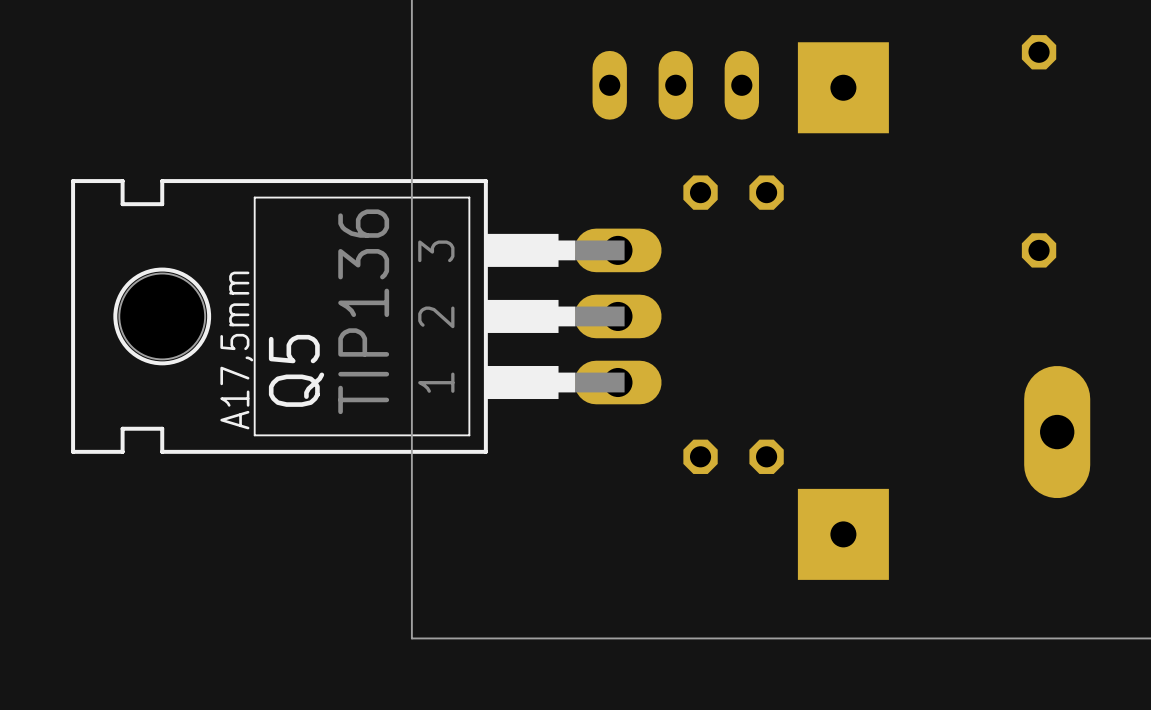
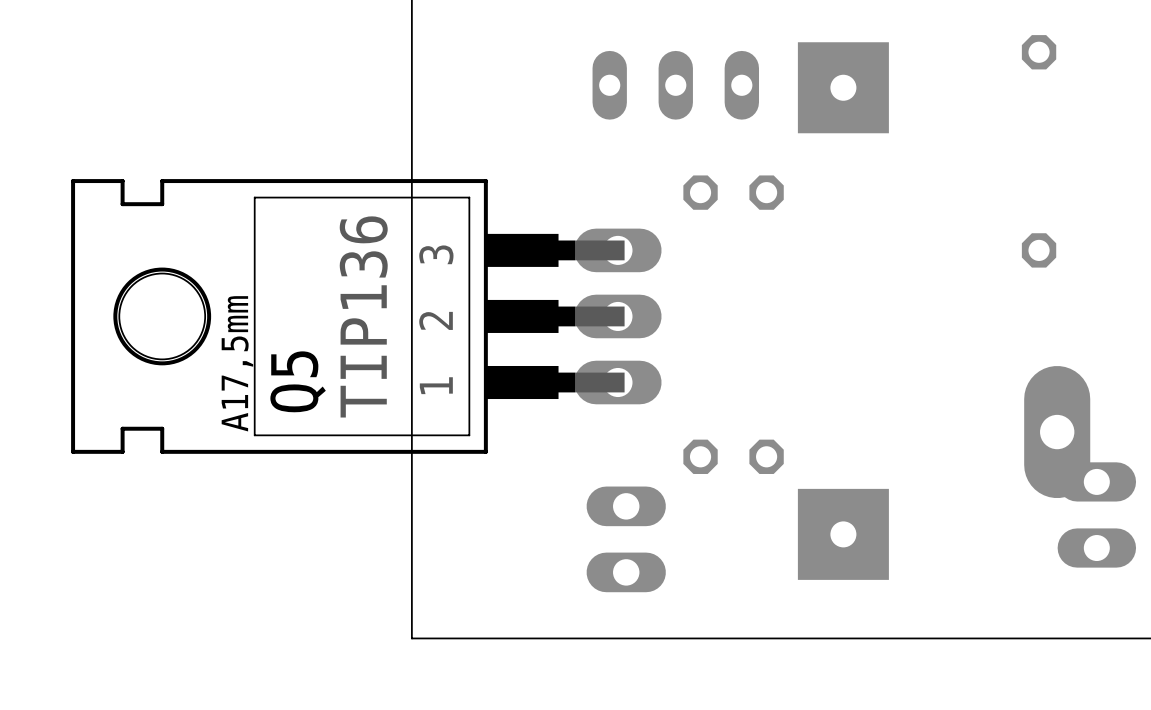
part: none -> (1096, 514)
part: none -> (626, 539)

